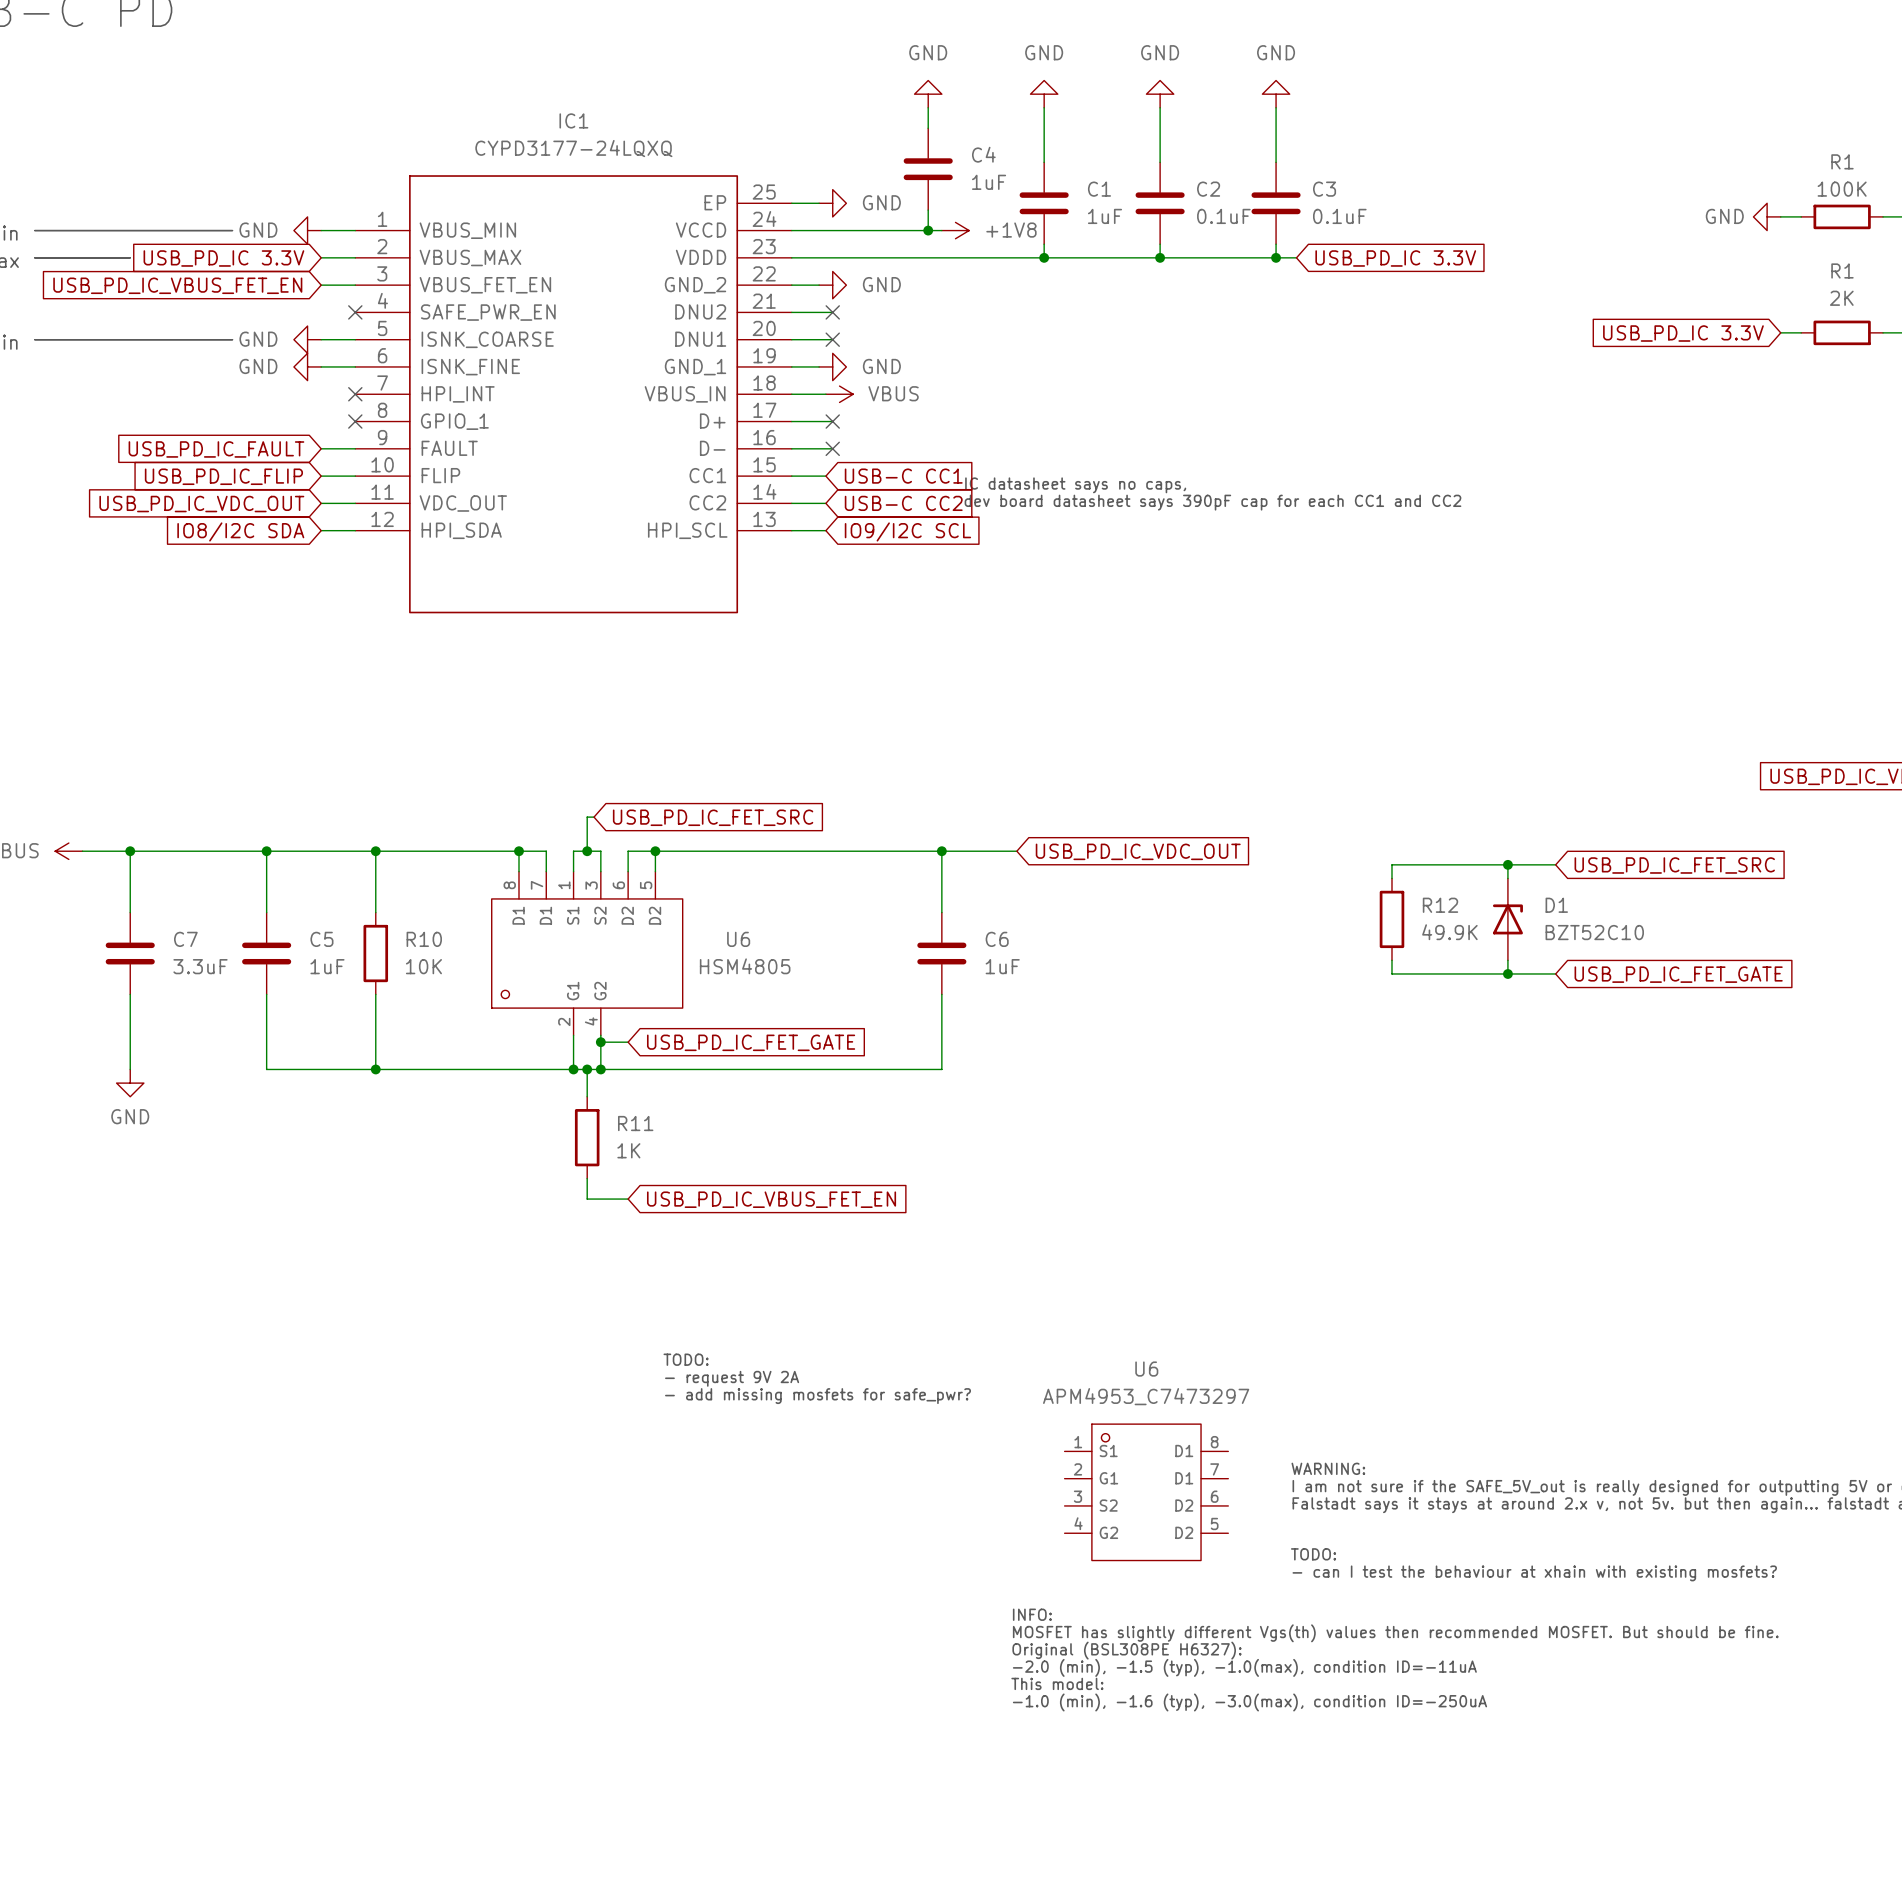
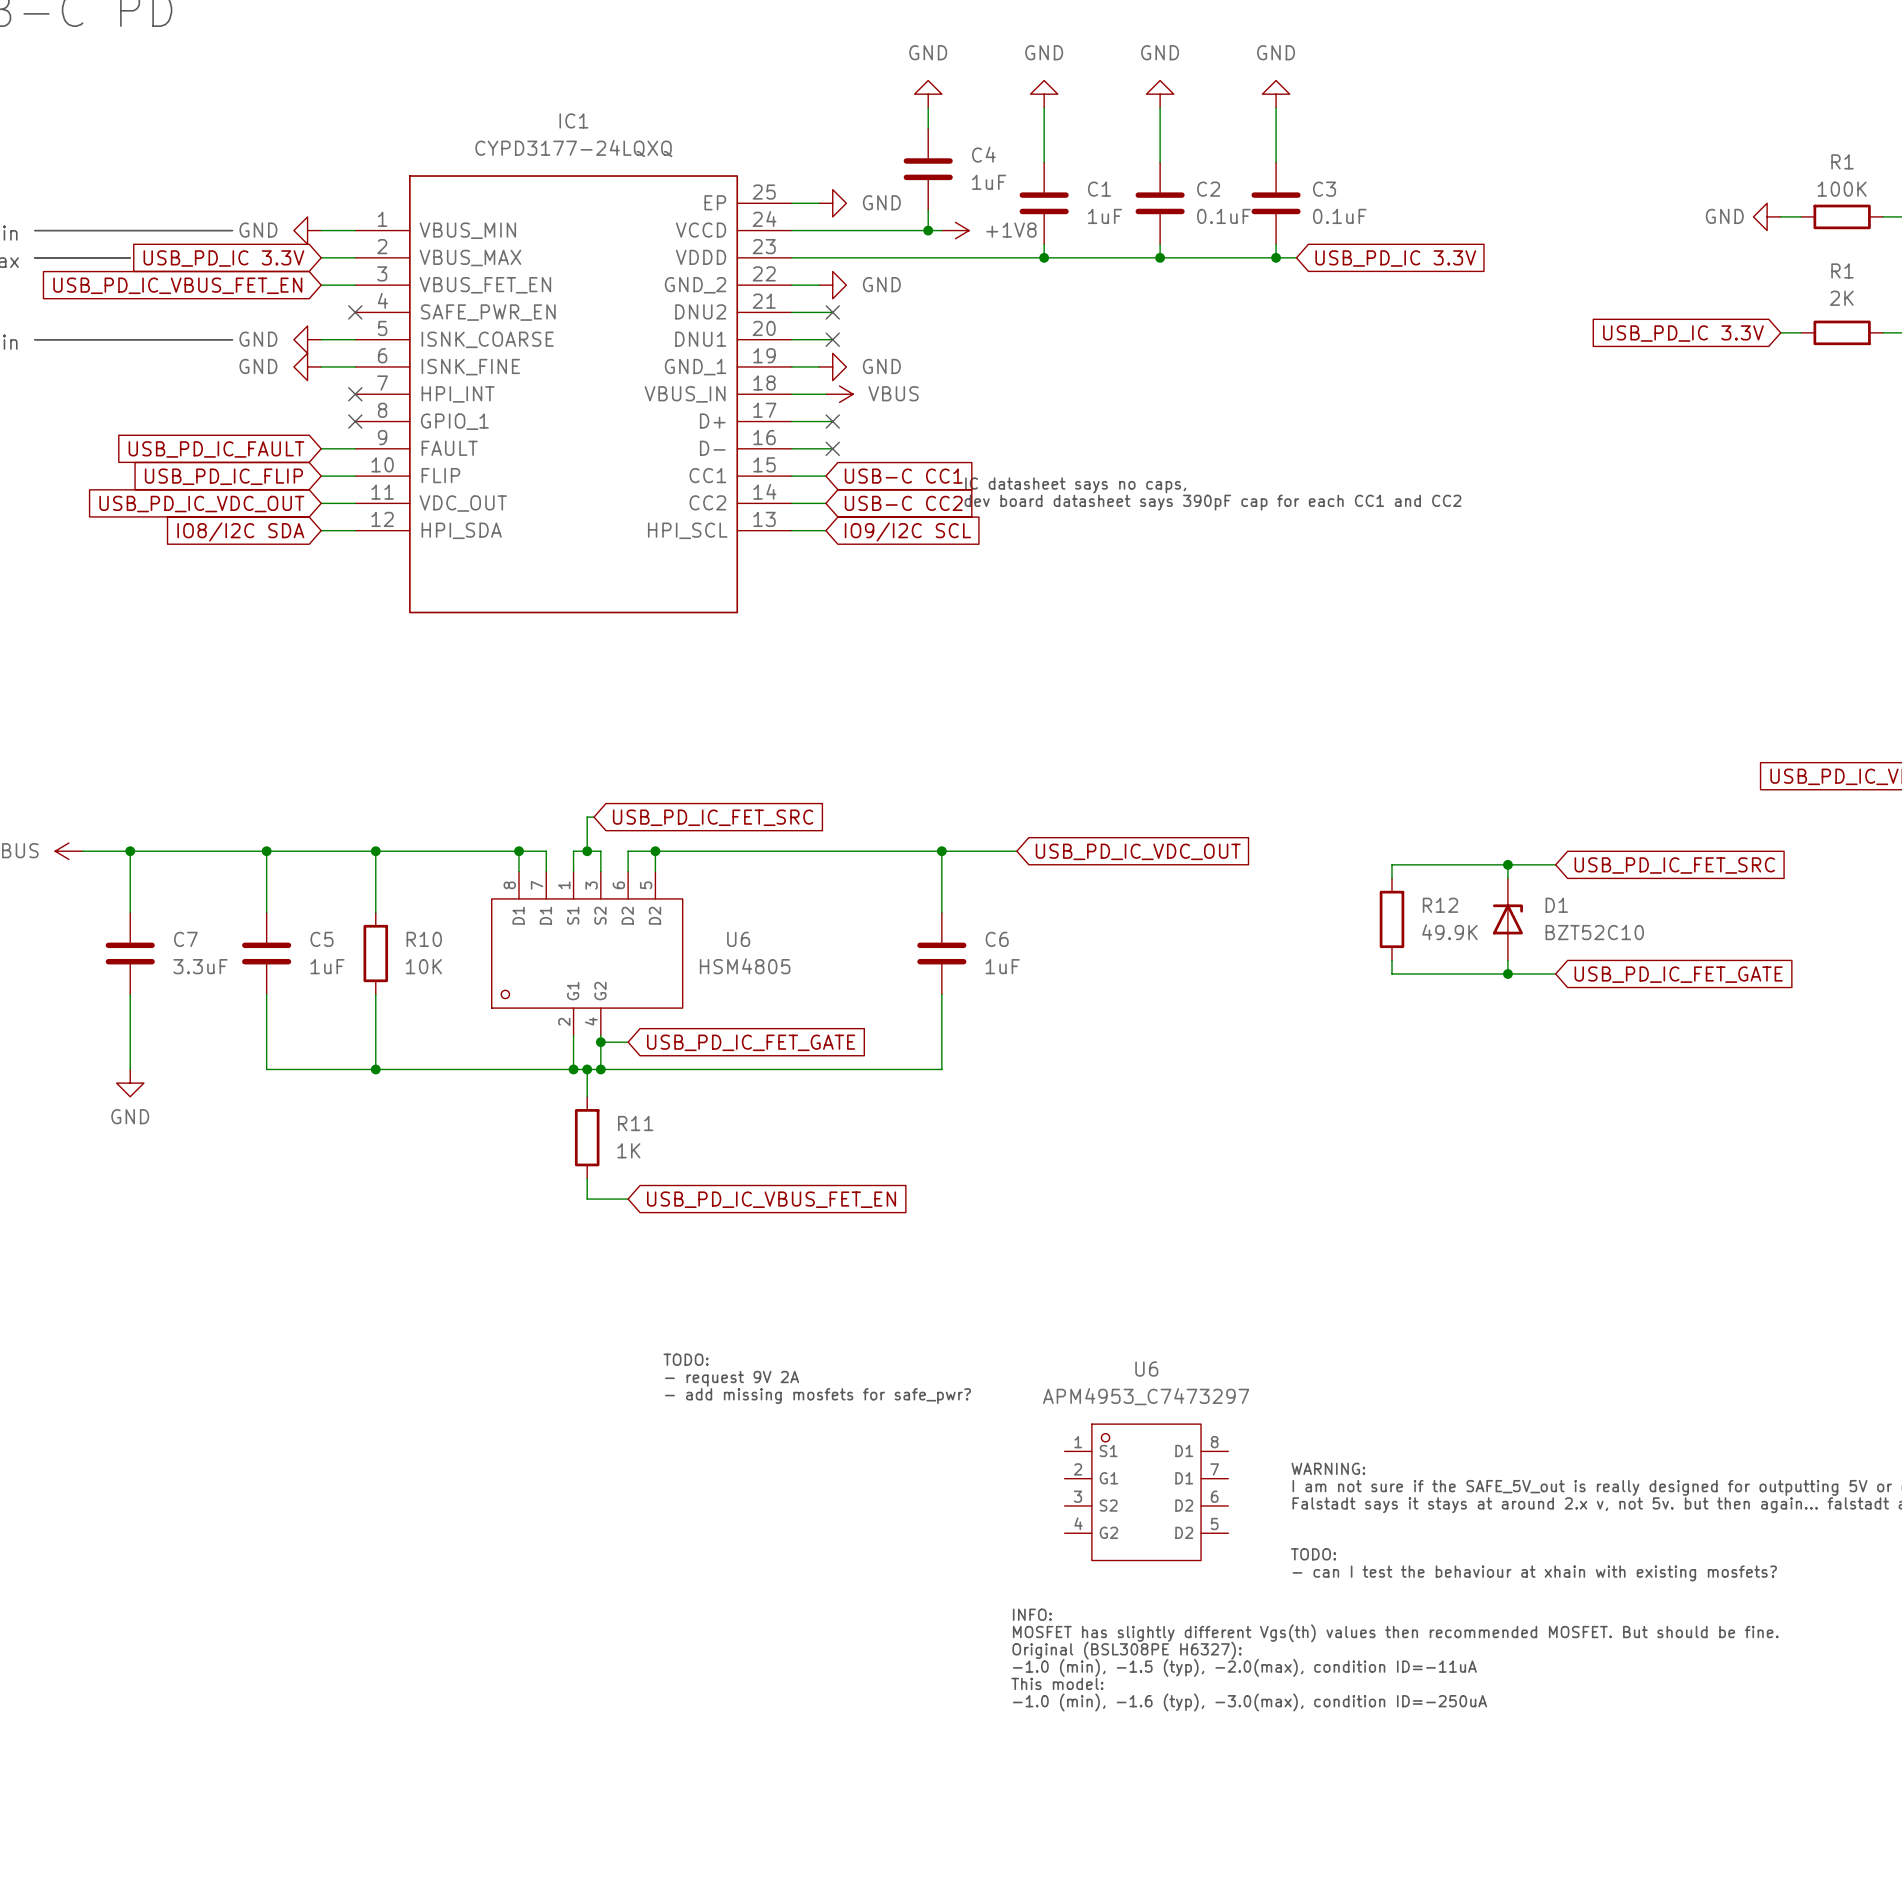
text: -2.0 (min), -1.5 (typ), -1.0(max), condition ID=-11uA (1244, 1667) -> -1.0 (min), -1.5 (typ), -2.0(max), condition ID=-11uA (1244, 1667)

